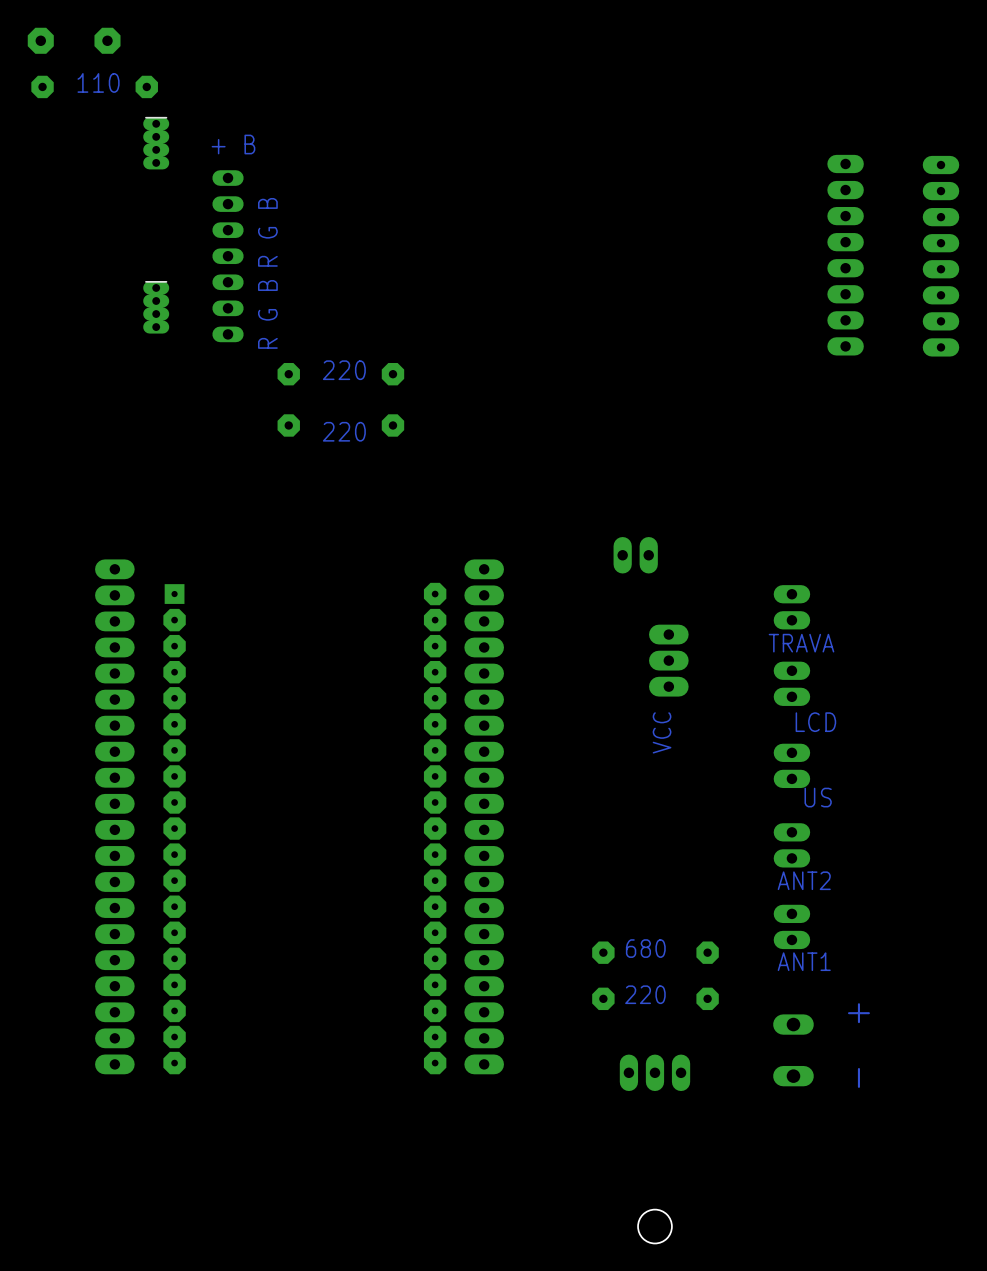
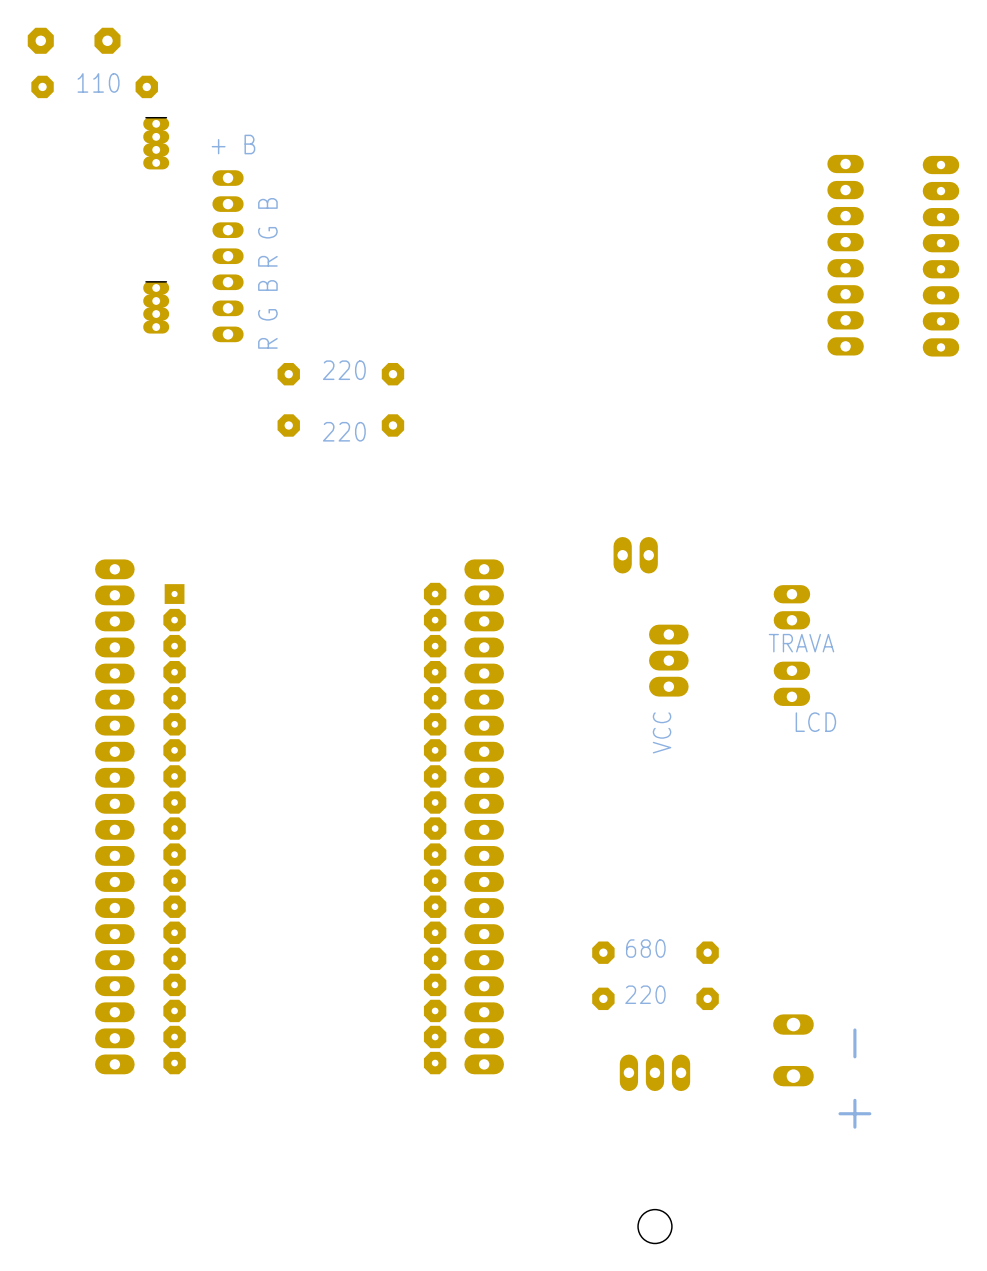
part: (791, 765) -> none
text: US (818, 797) -> none
part: (791, 845) -> none
text: ANT2 (804, 880) -> none
part: (791, 926) -> none
text: ANT1 (804, 961) -> none
text: - + (858, 1045) -> none
text: none -> + - (854, 1078)

